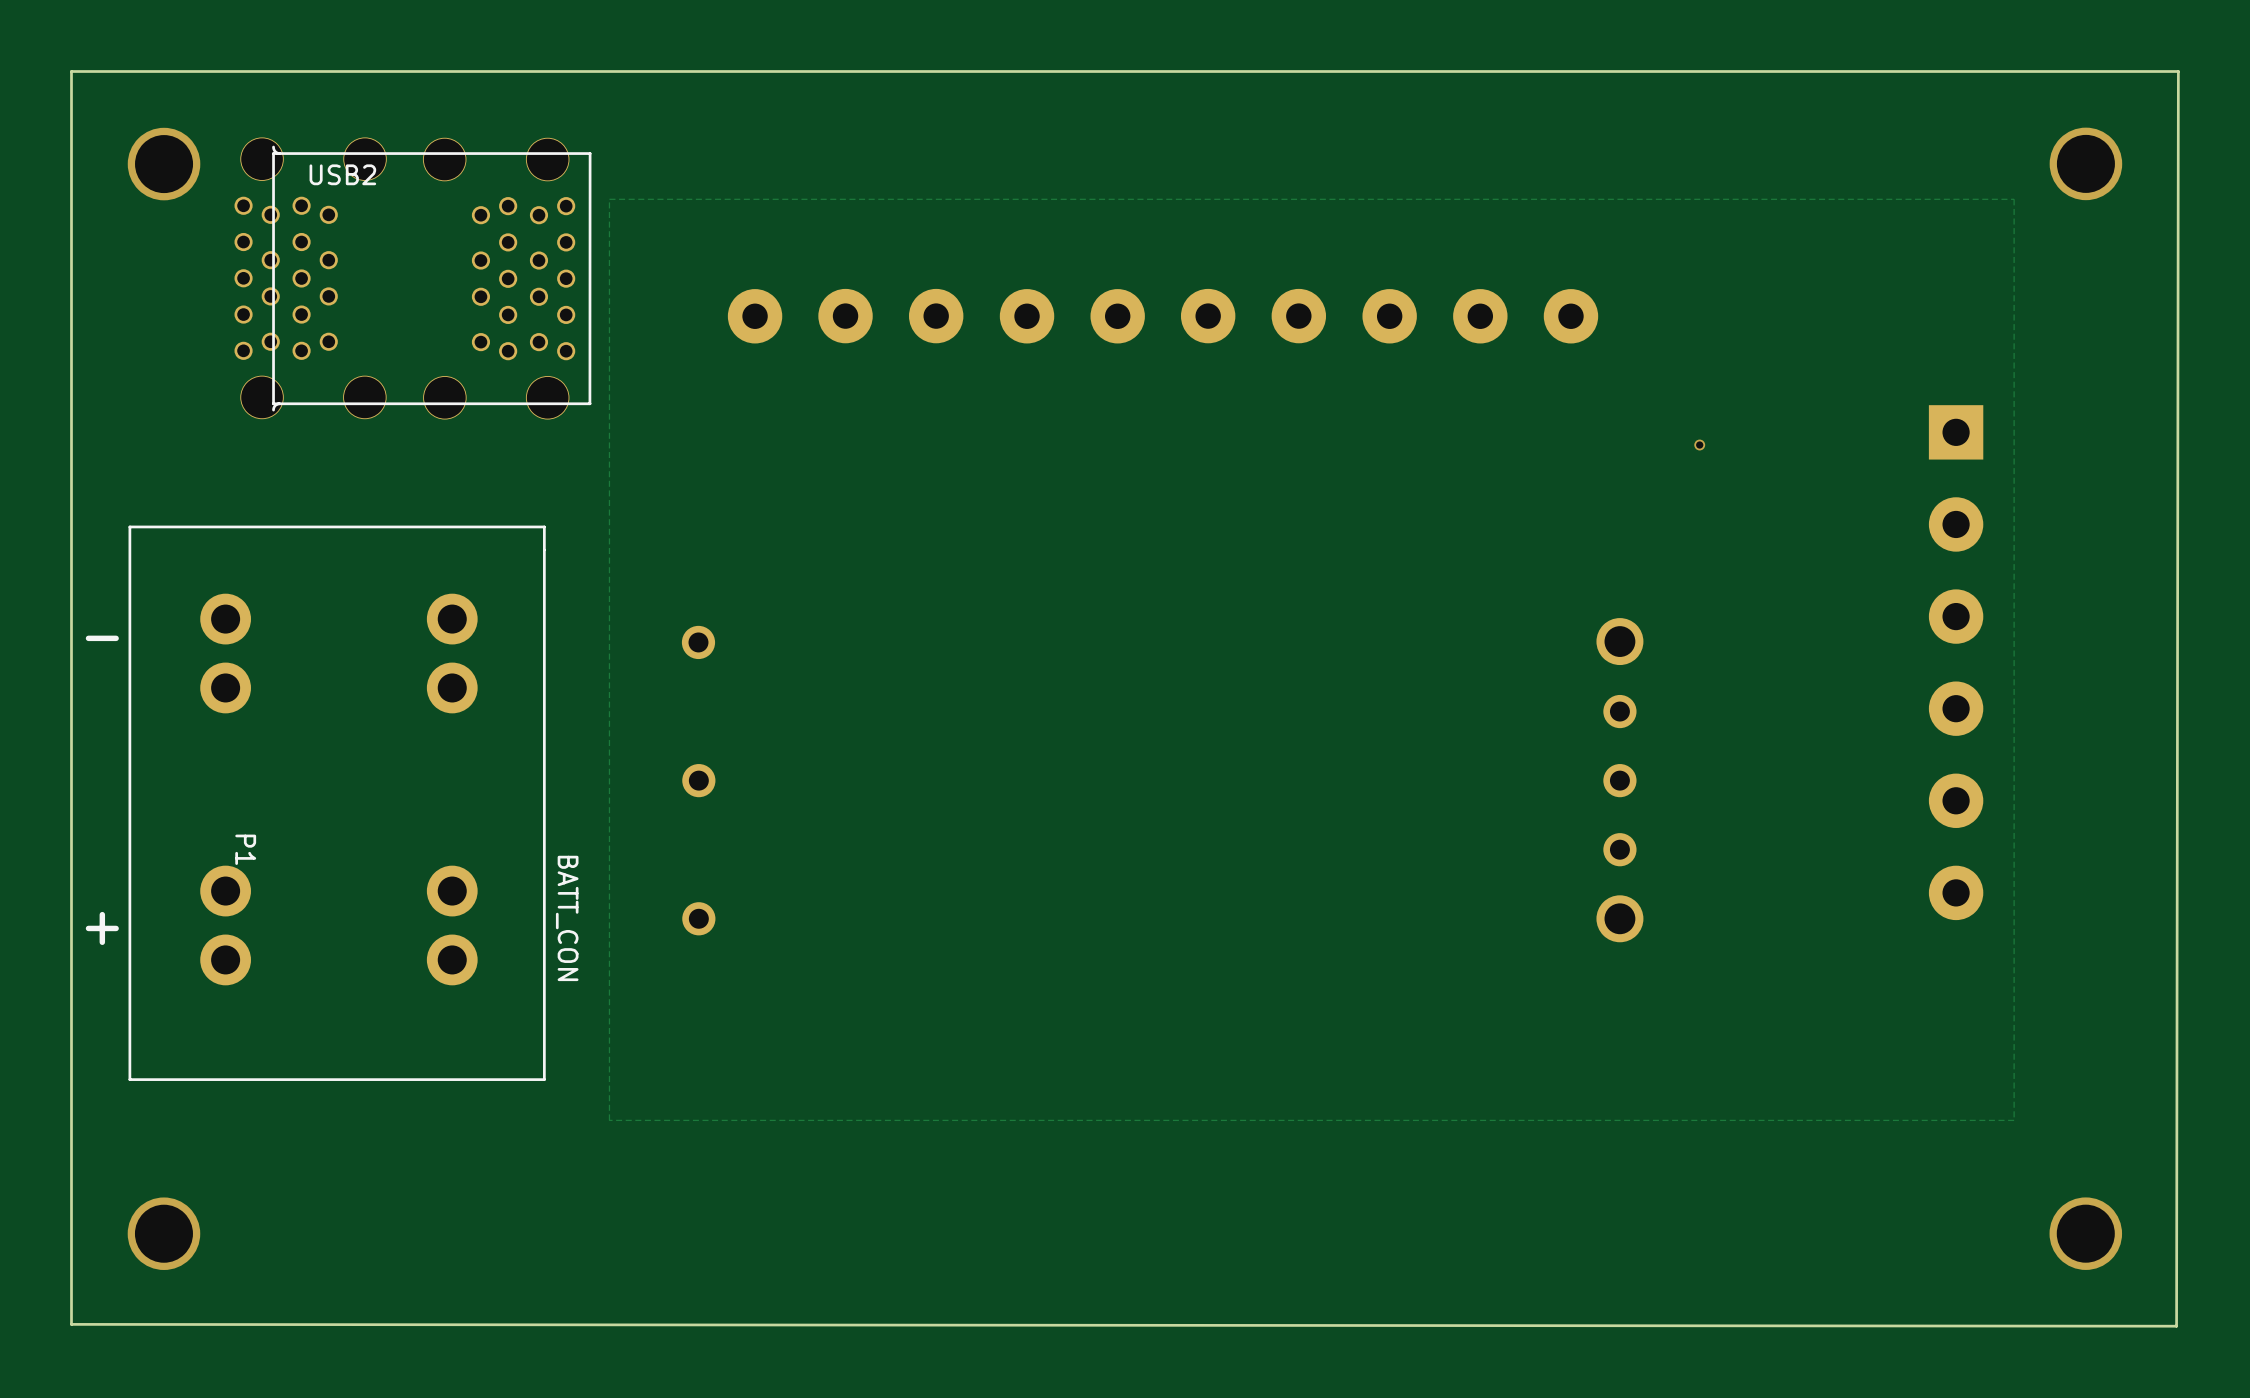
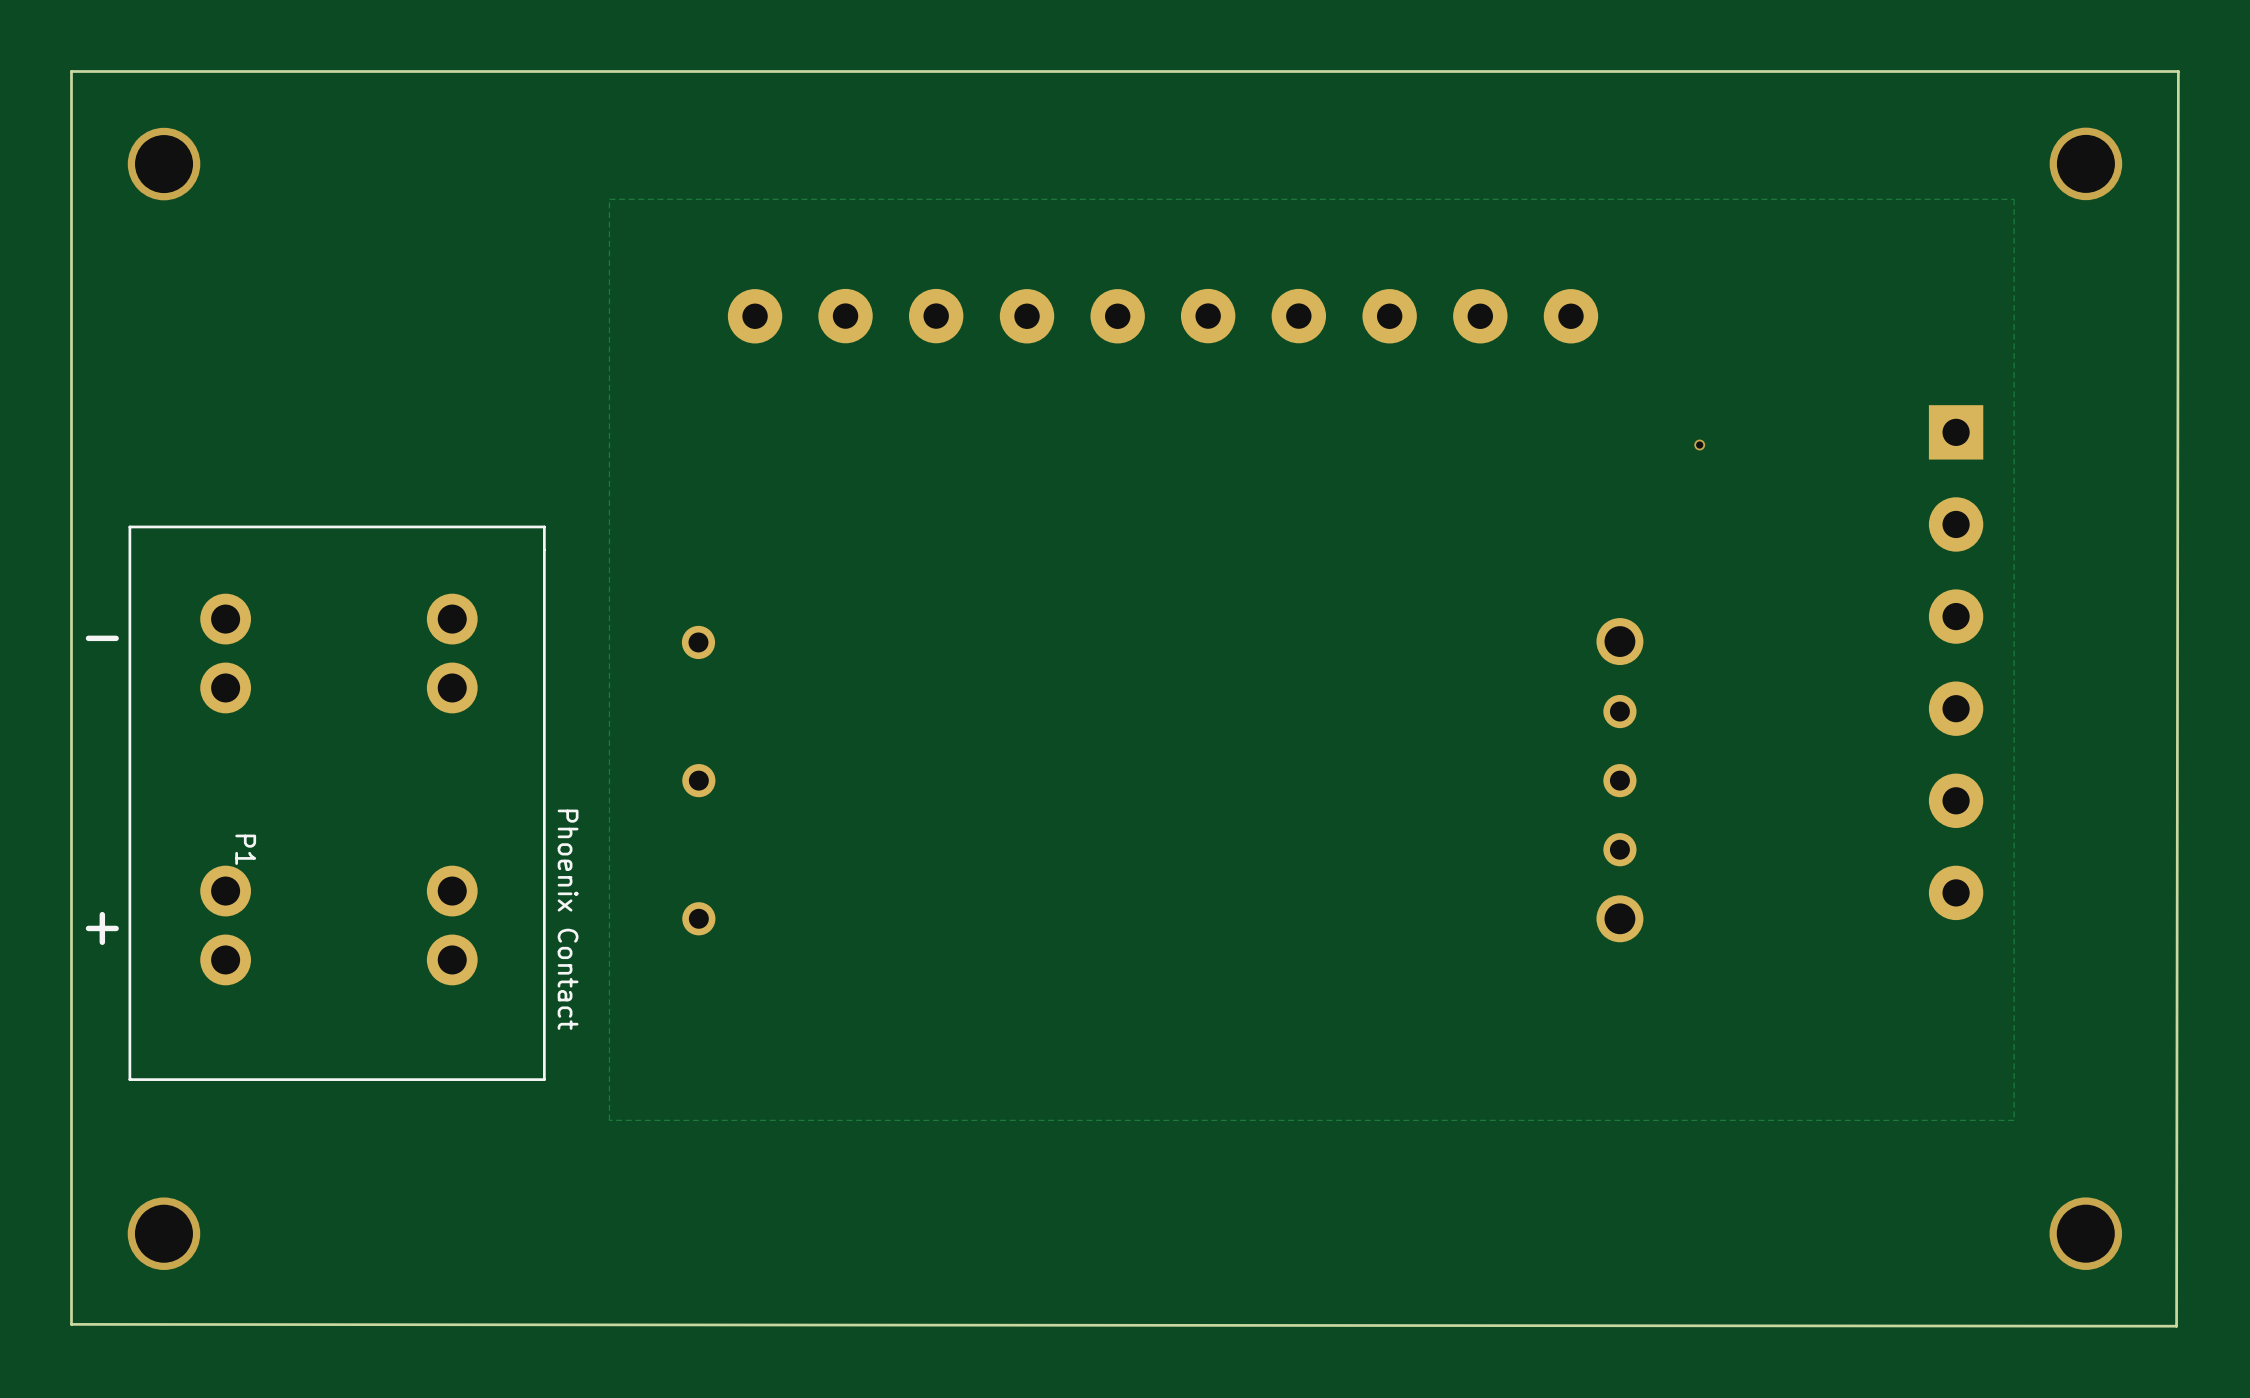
part: (310, 278) -> none
USB2: (431, 278) -> none
P1 value: BATT_CON (567, 918) -> Phoenix Contact (568, 919)

